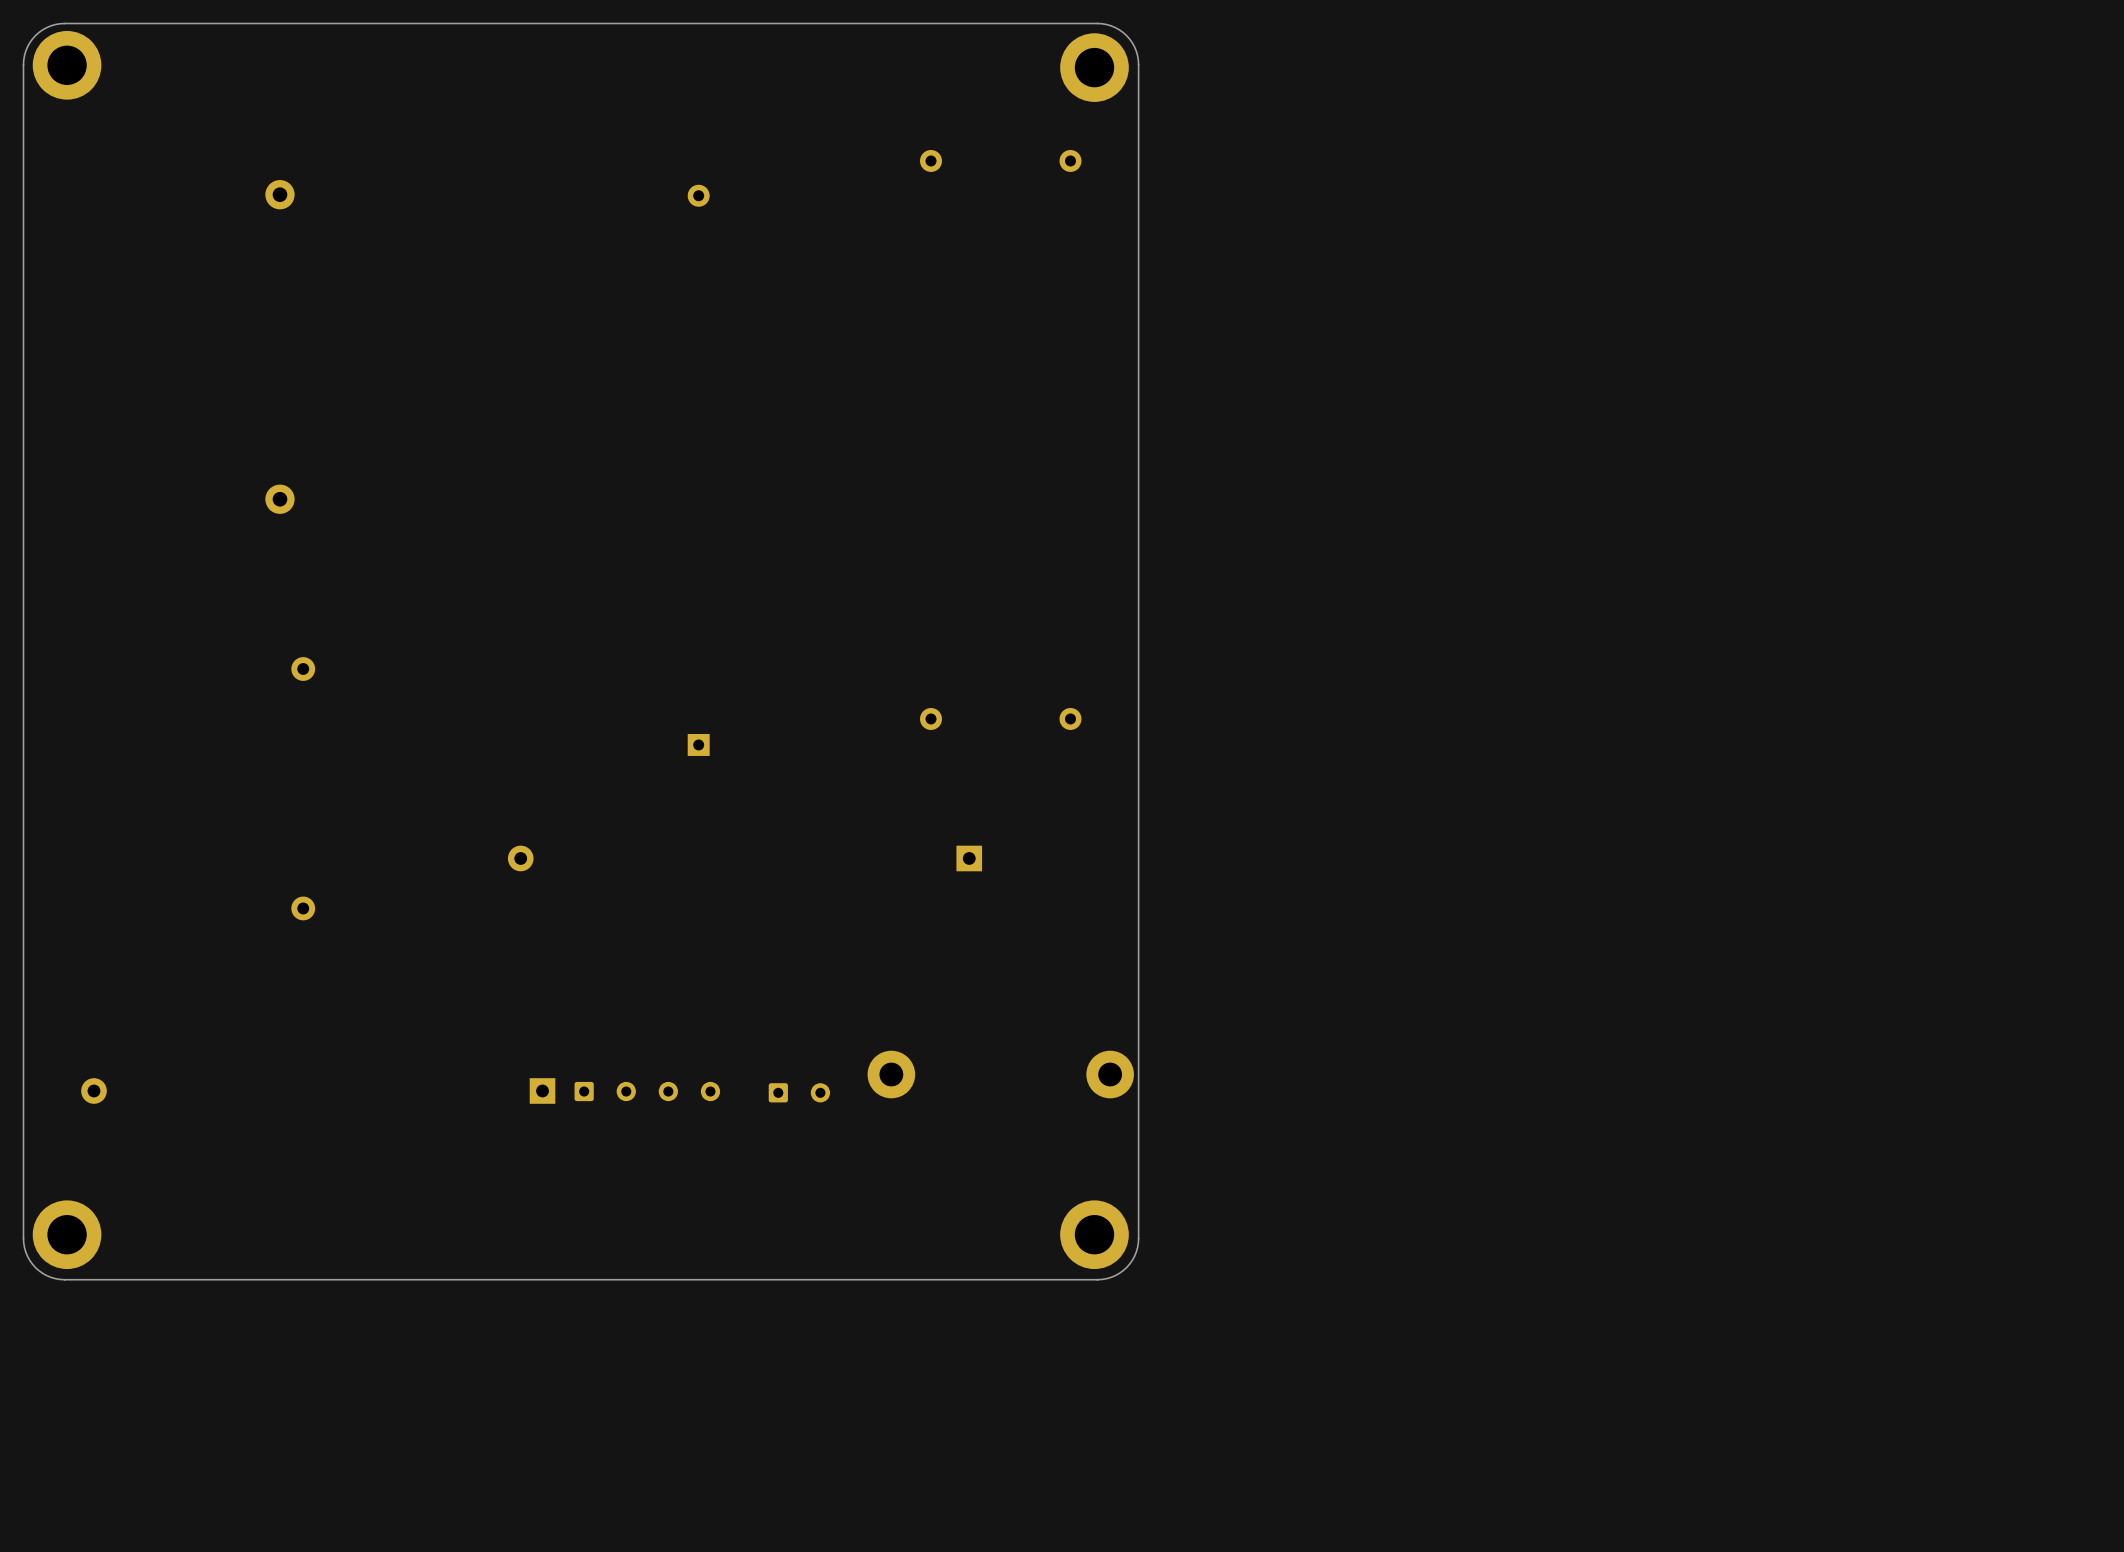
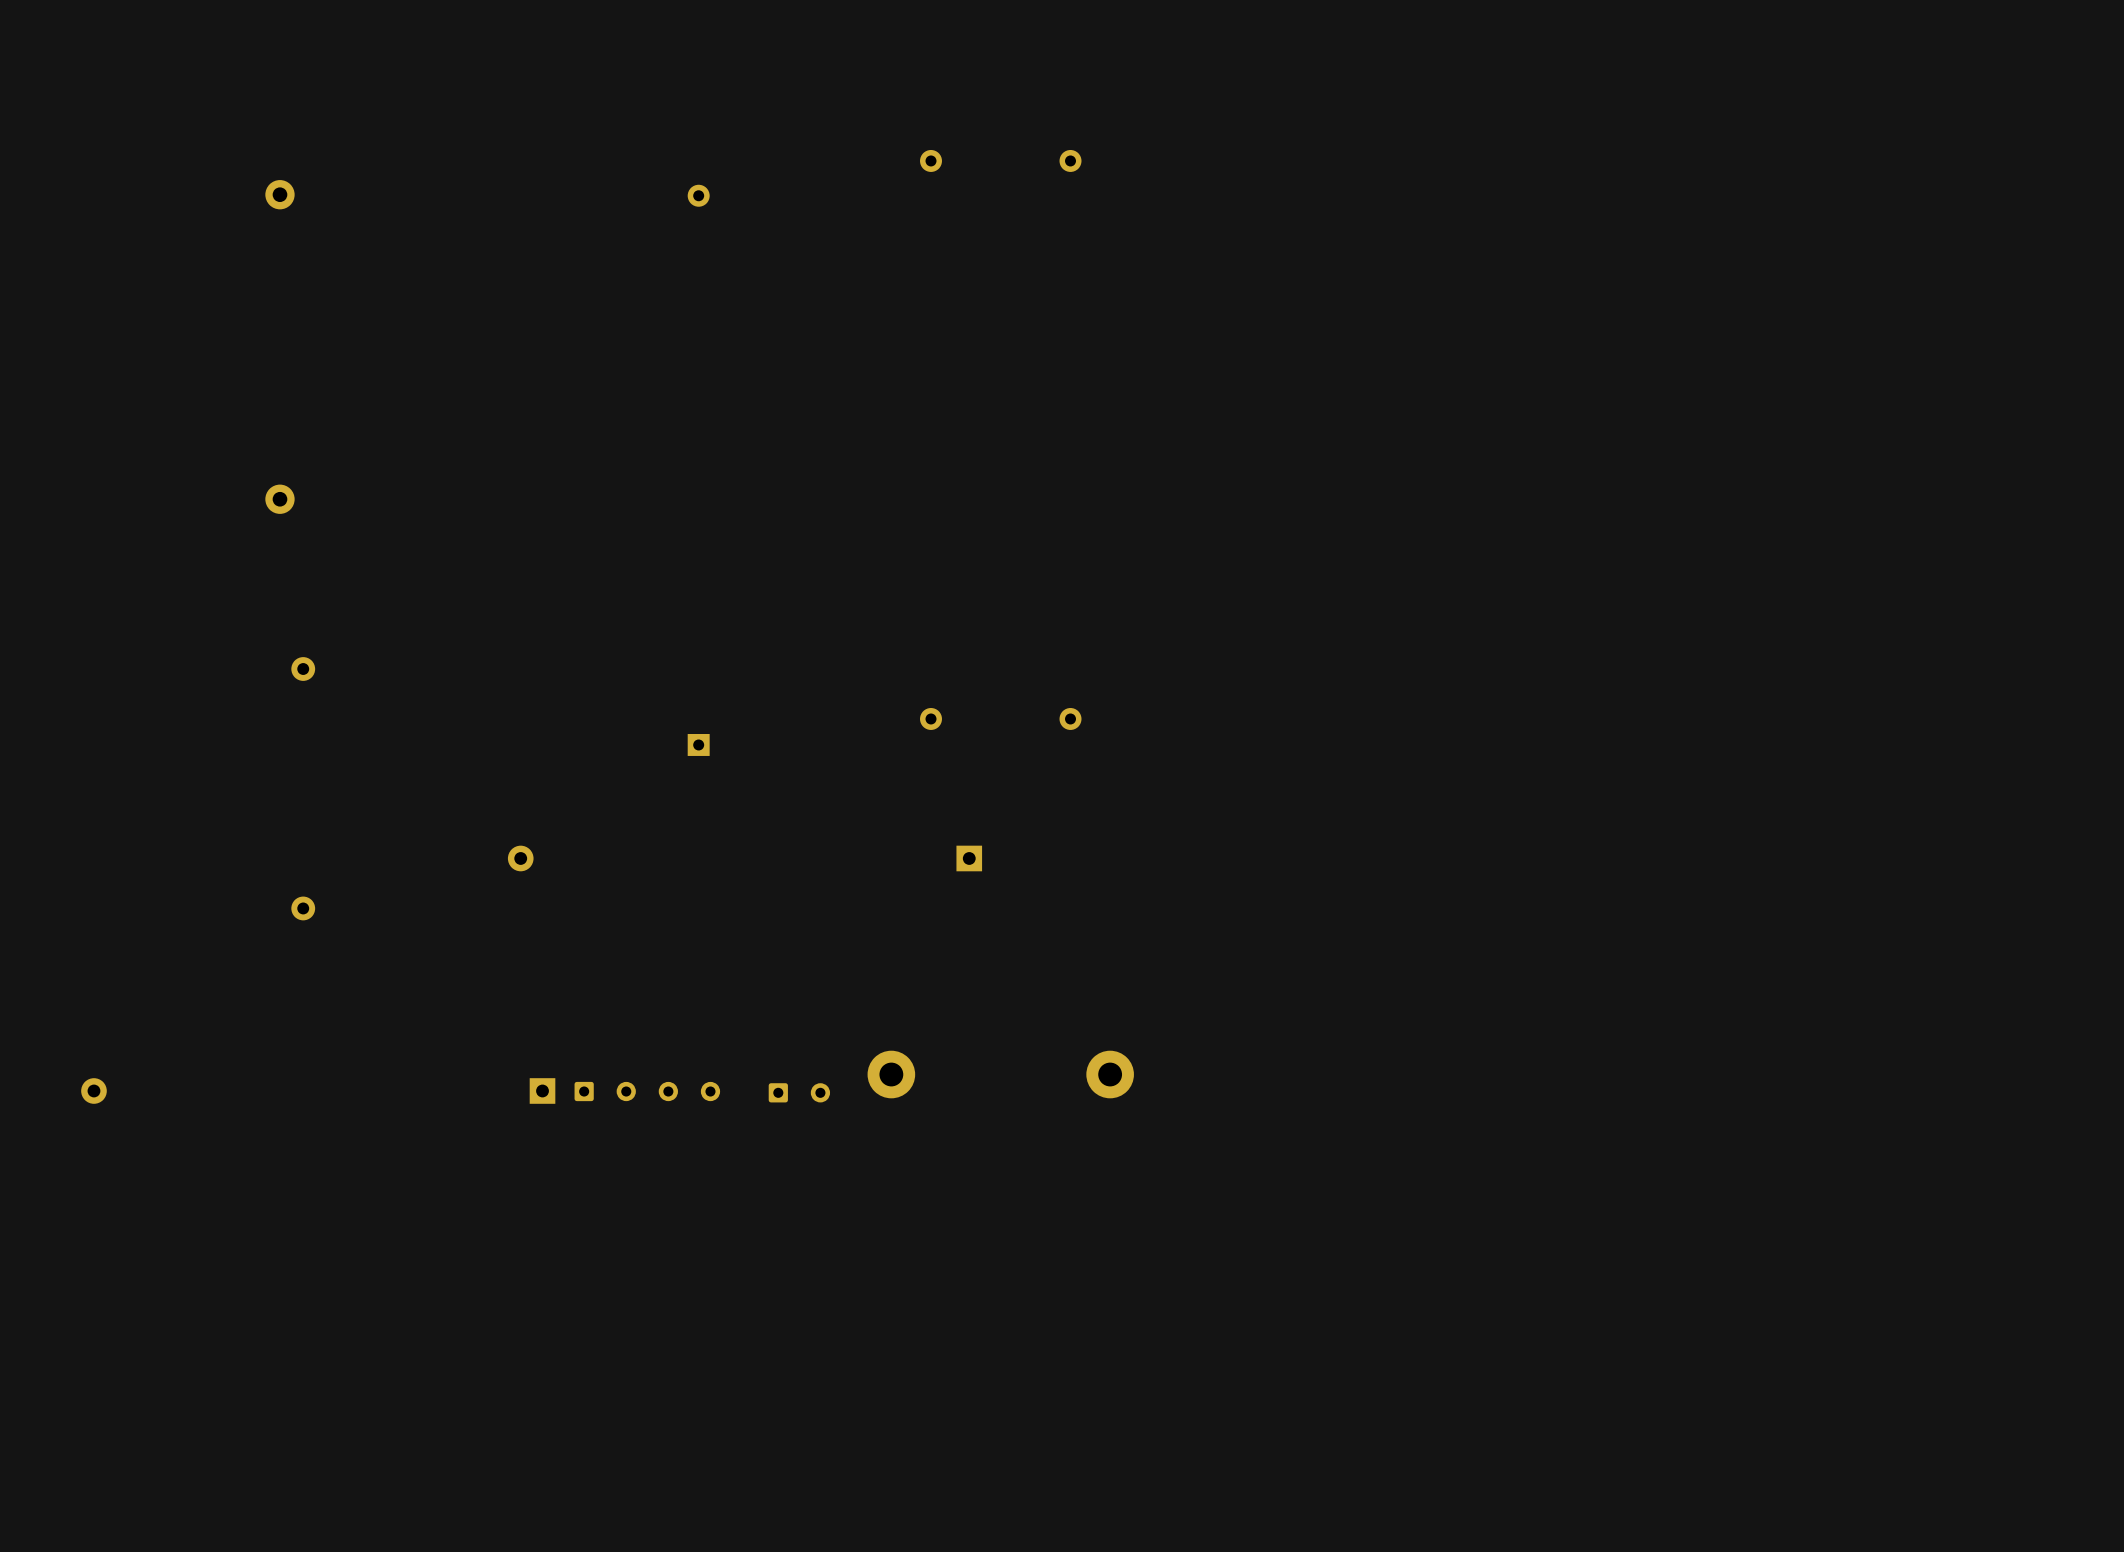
board edge: (1097, 23) (64, 23) (46, 27) (32, 39) (25, 51) (23, 64) (23, 1238) (27, 1256) (39, 1270) (51, 1277) (64, 1279) (1097, 1279) (1115, 1275) (1129, 1264) (1136, 1252) (1138, 1238) (1138, 64) (1134, 46) (1126, 35) (1111, 25) (1097, 23) -> none
part: (67, 65) -> none
part: (1094, 67) -> none
part: (67, 1234) -> none
part: (1094, 1234) -> none

